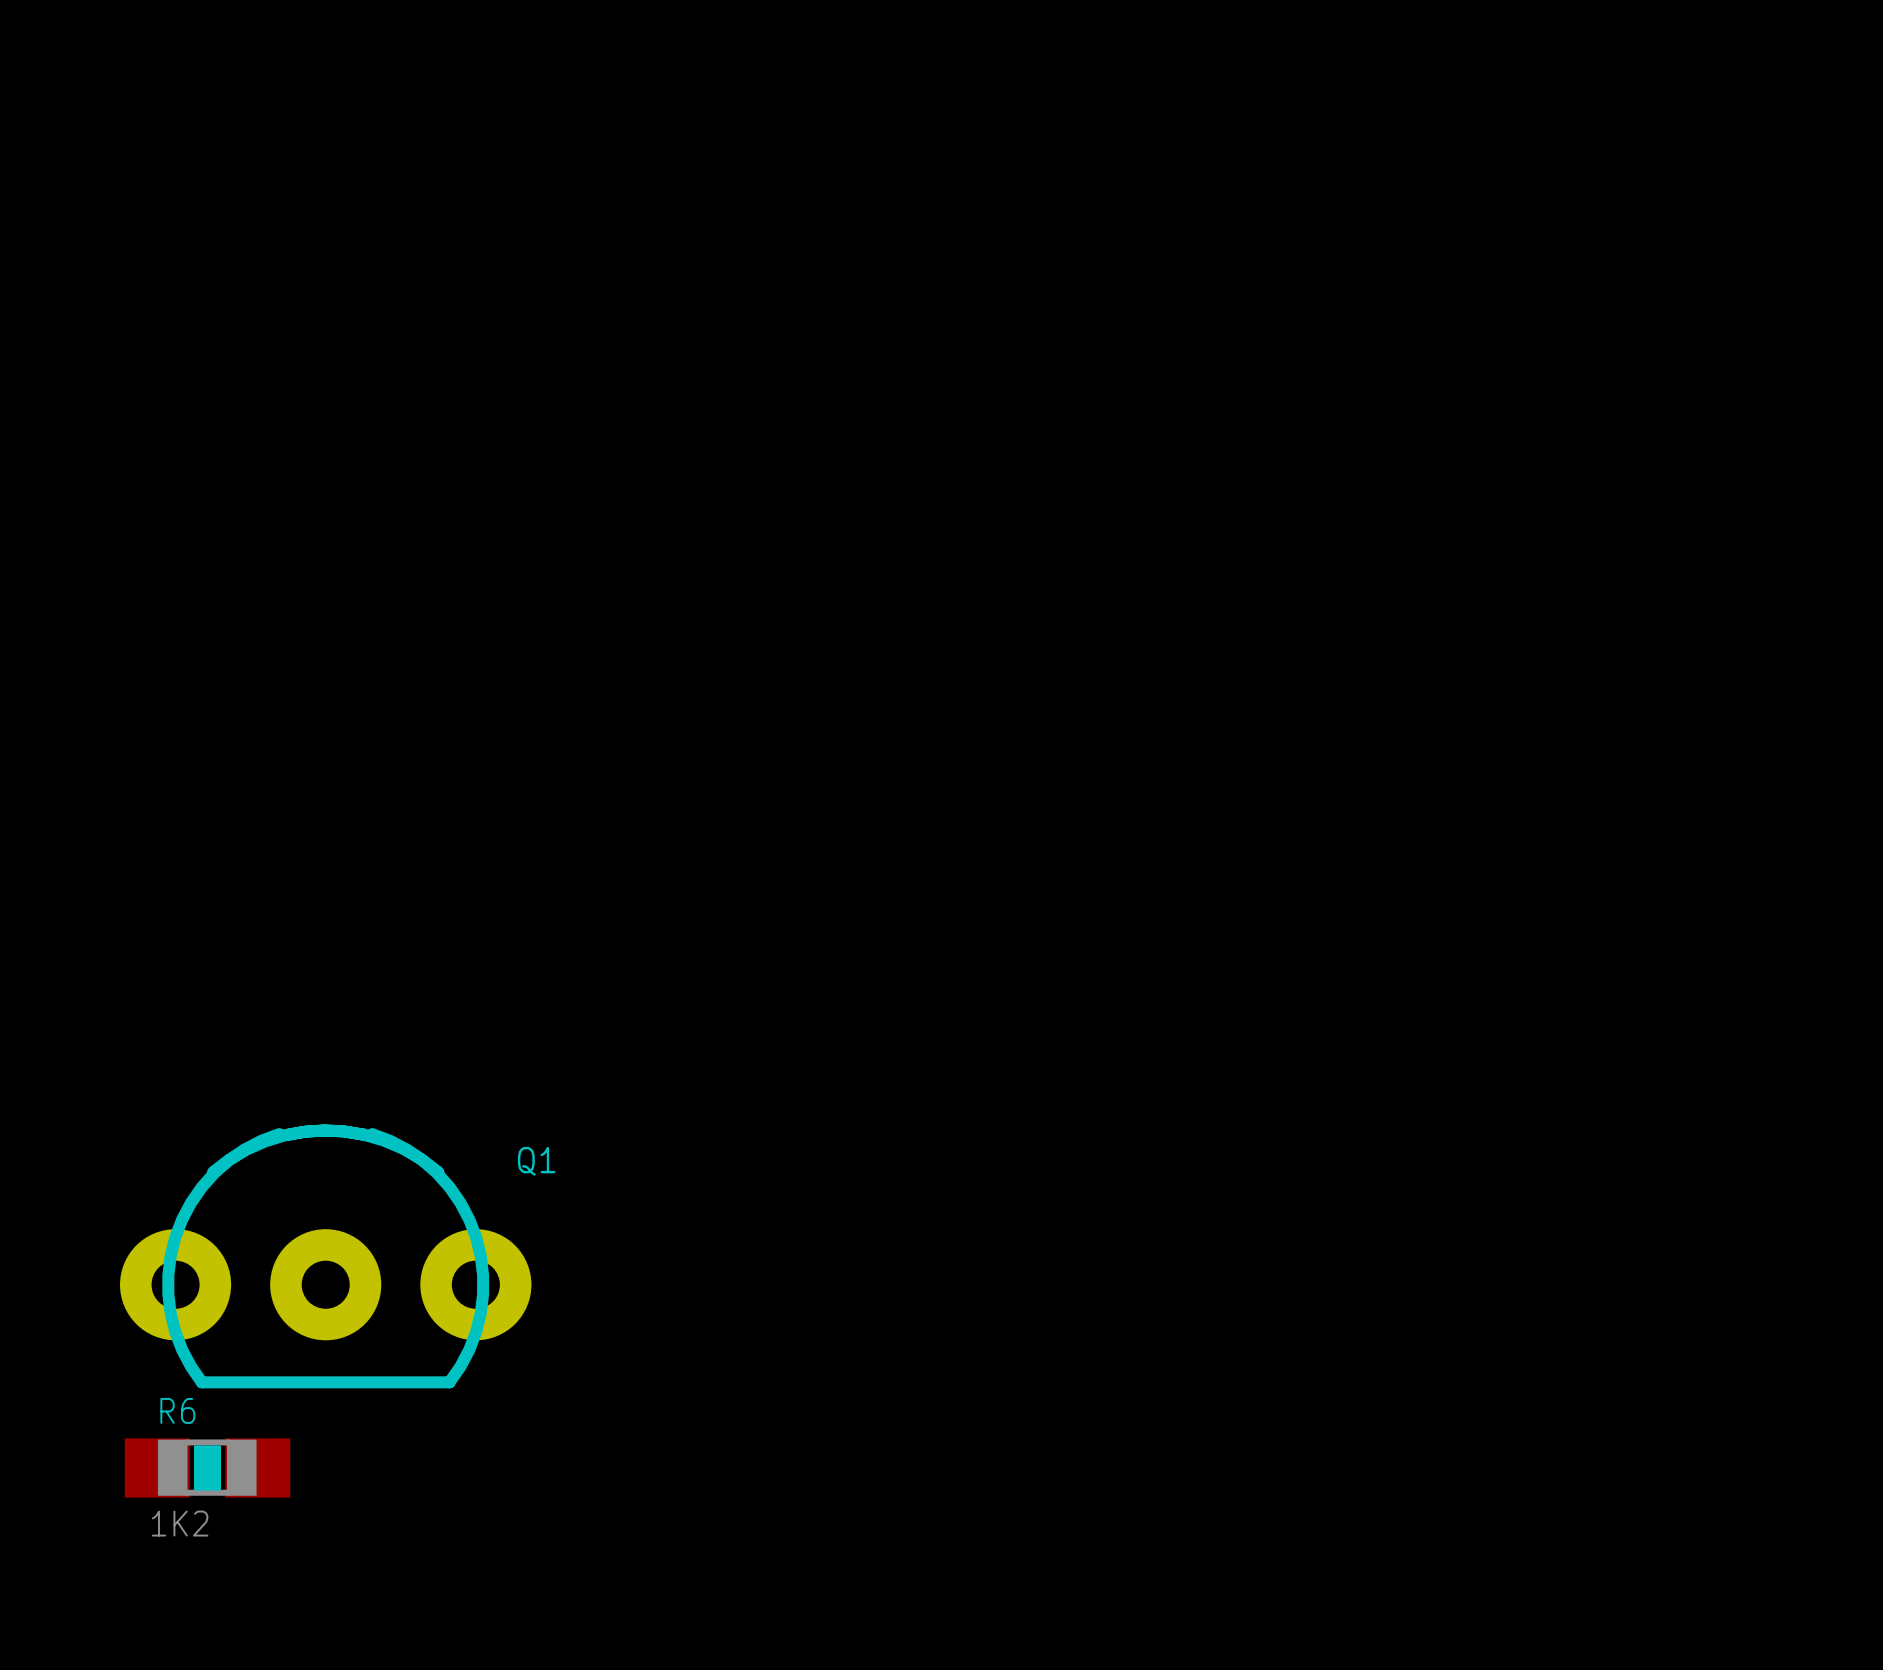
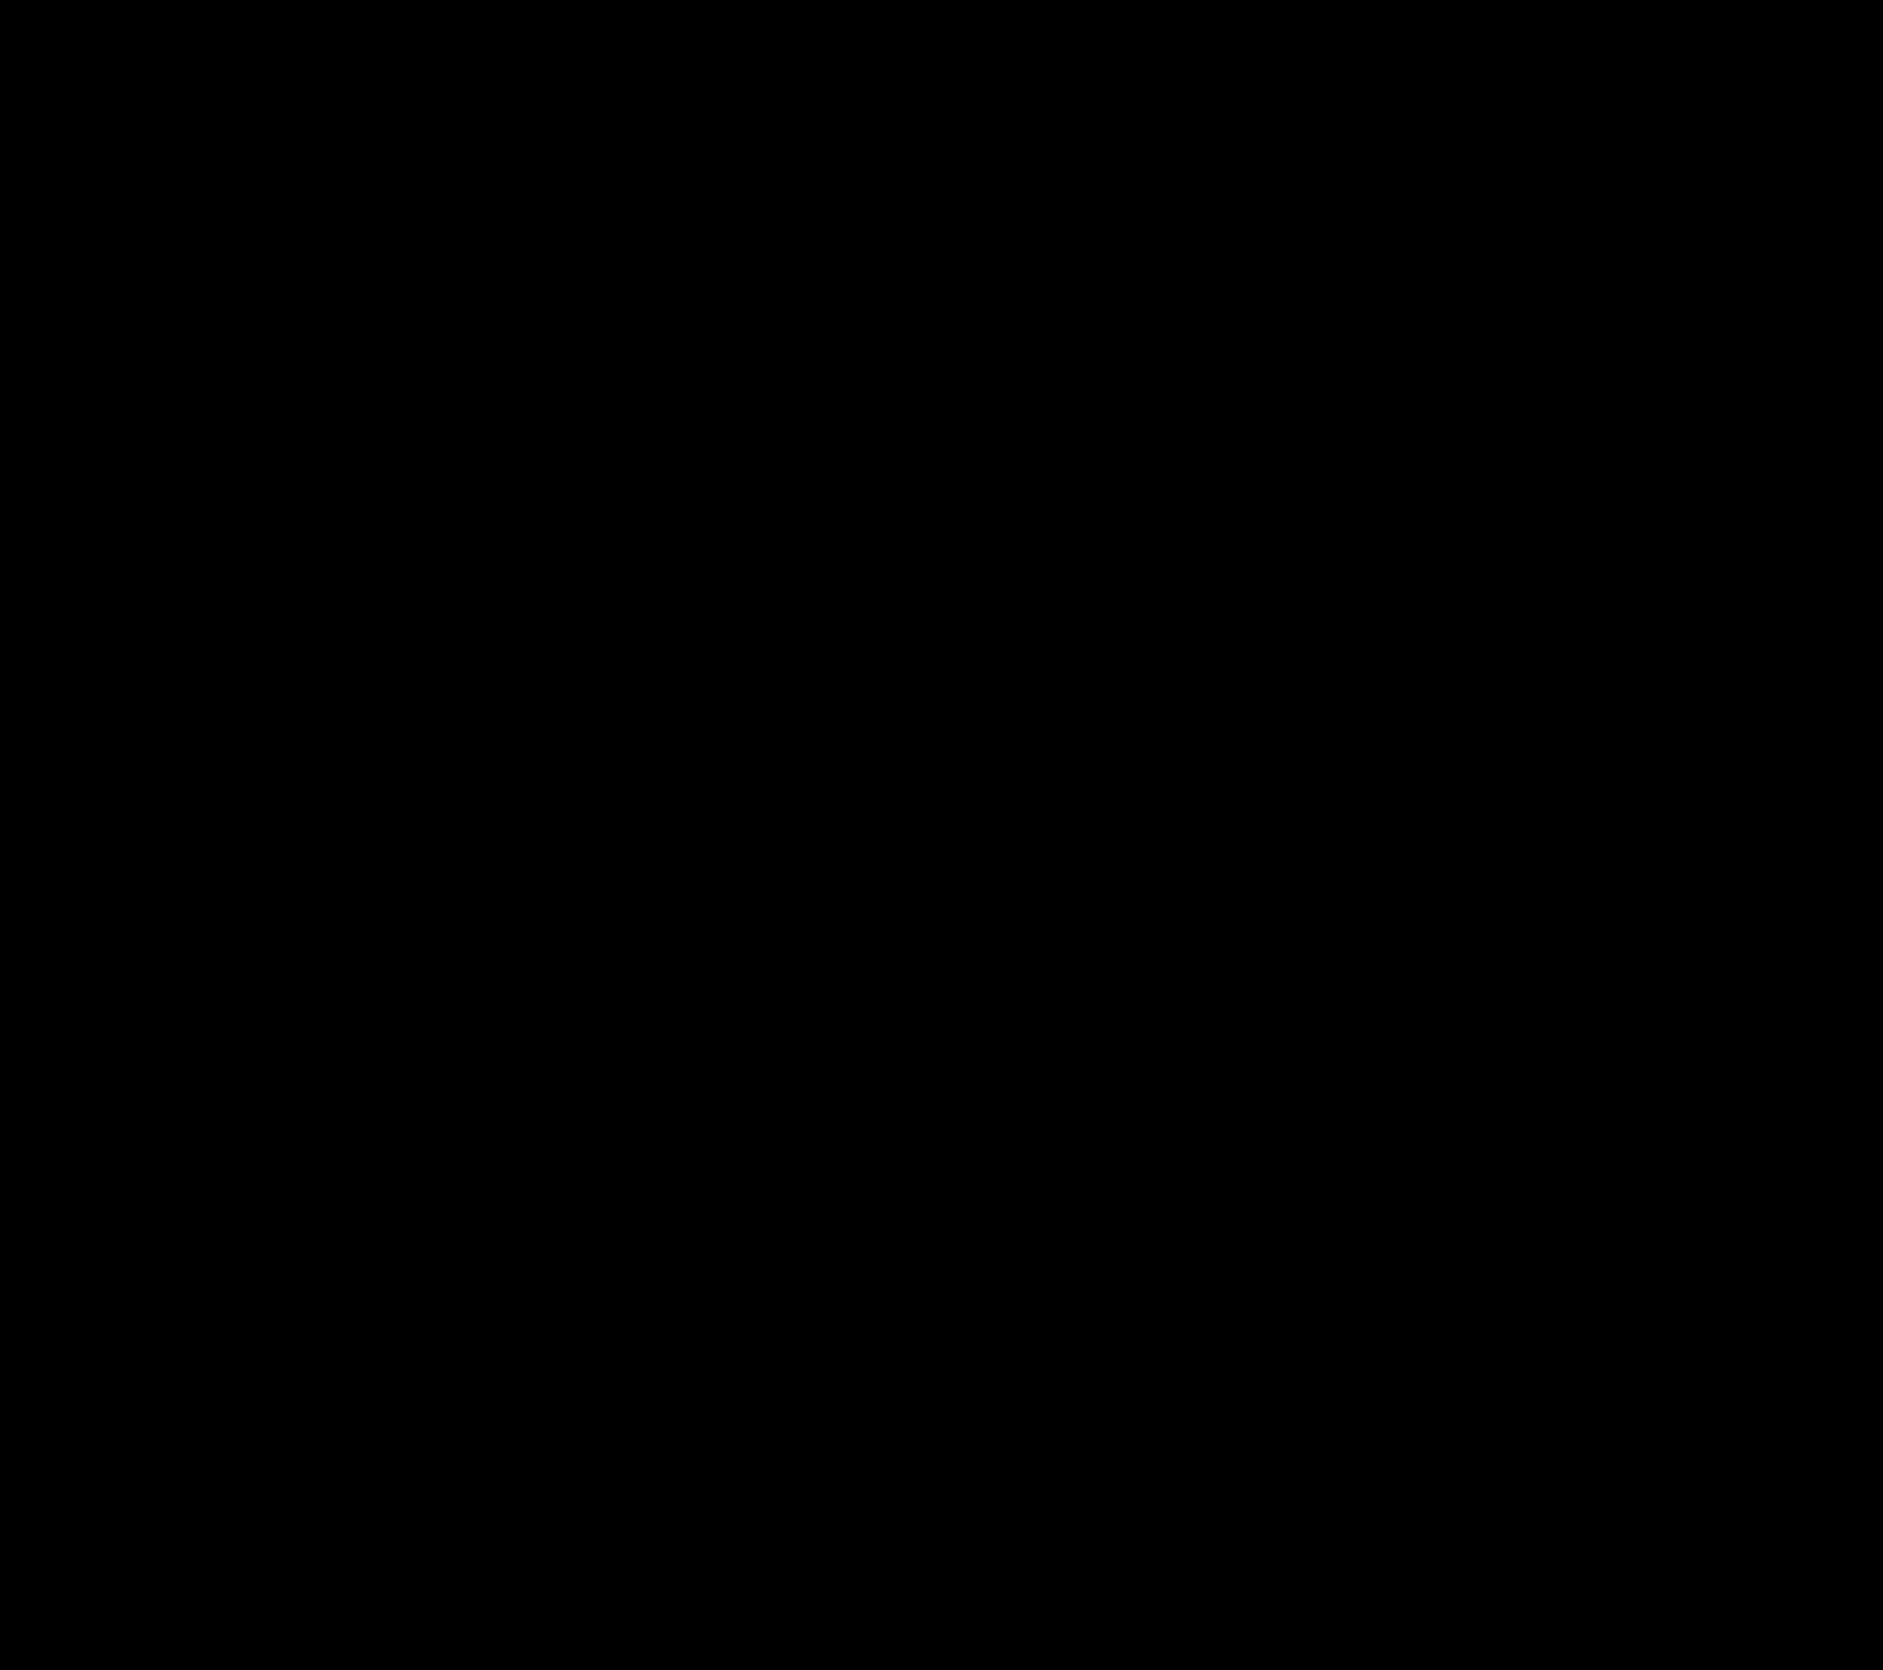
Q1: (325, 1256) -> none
R6: 1K2 (207, 1468) -> none

